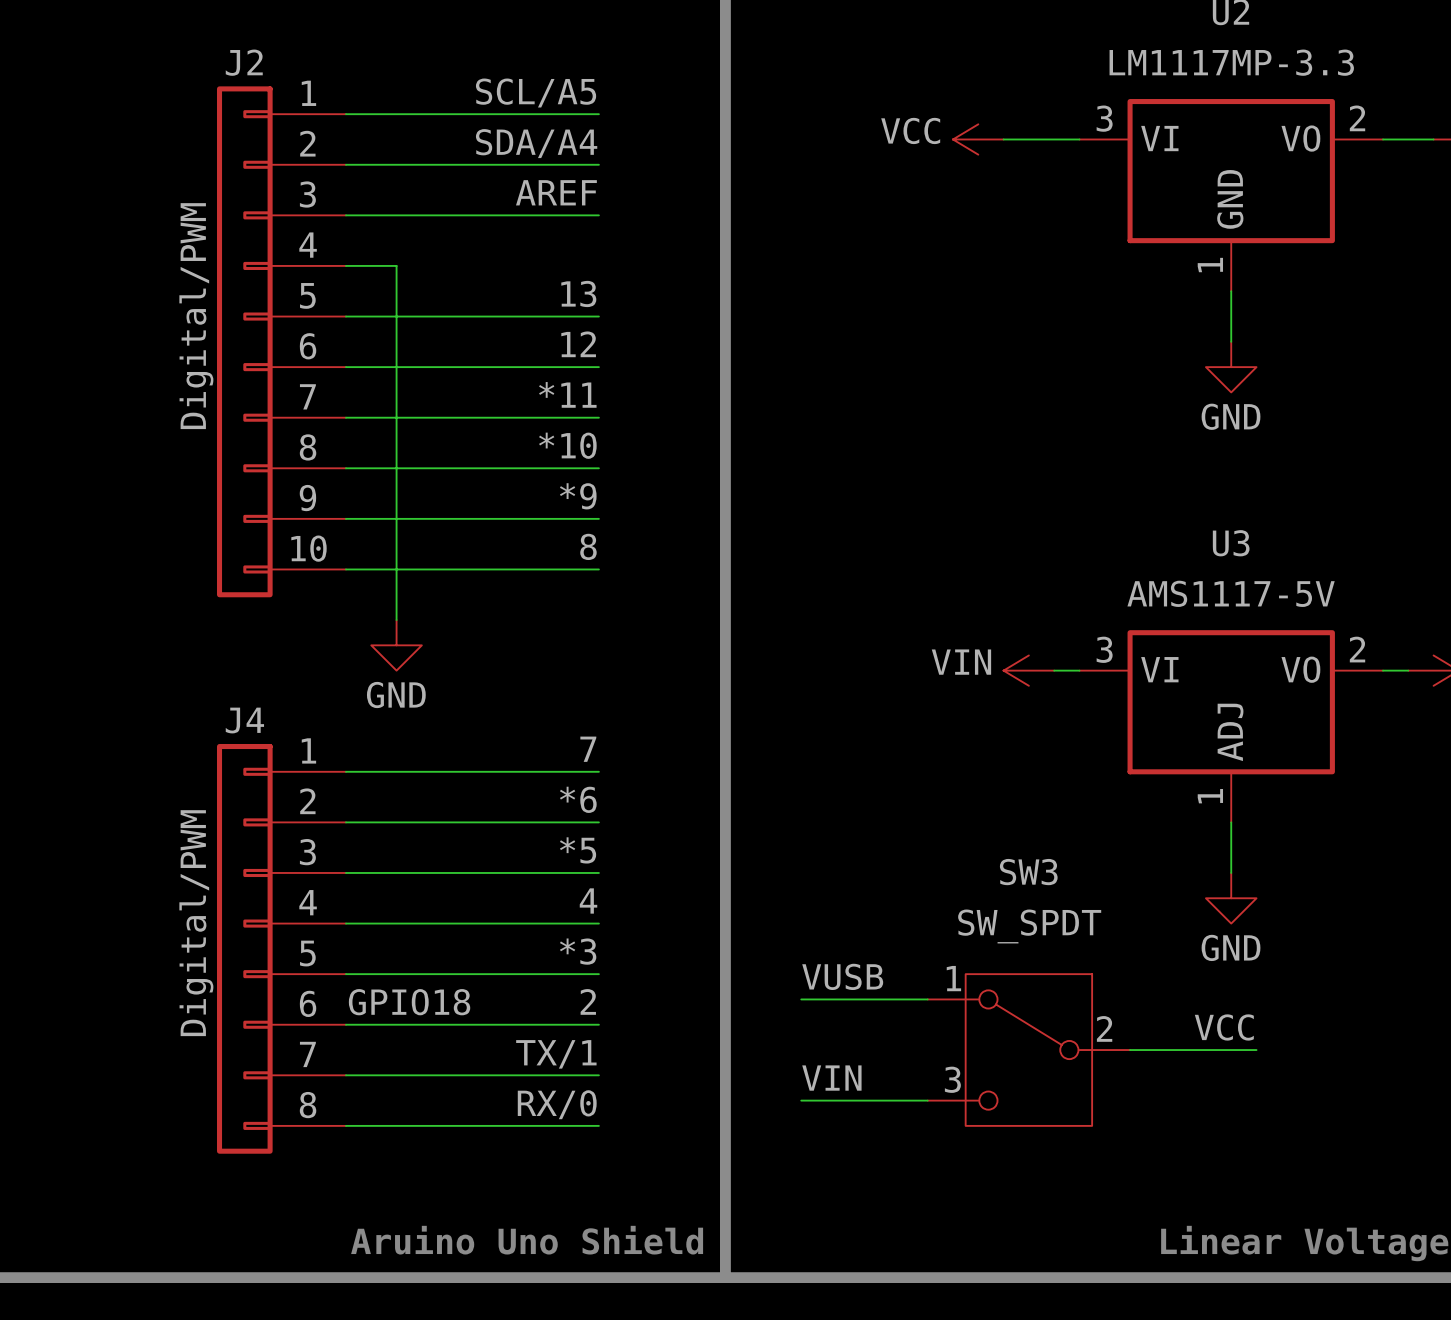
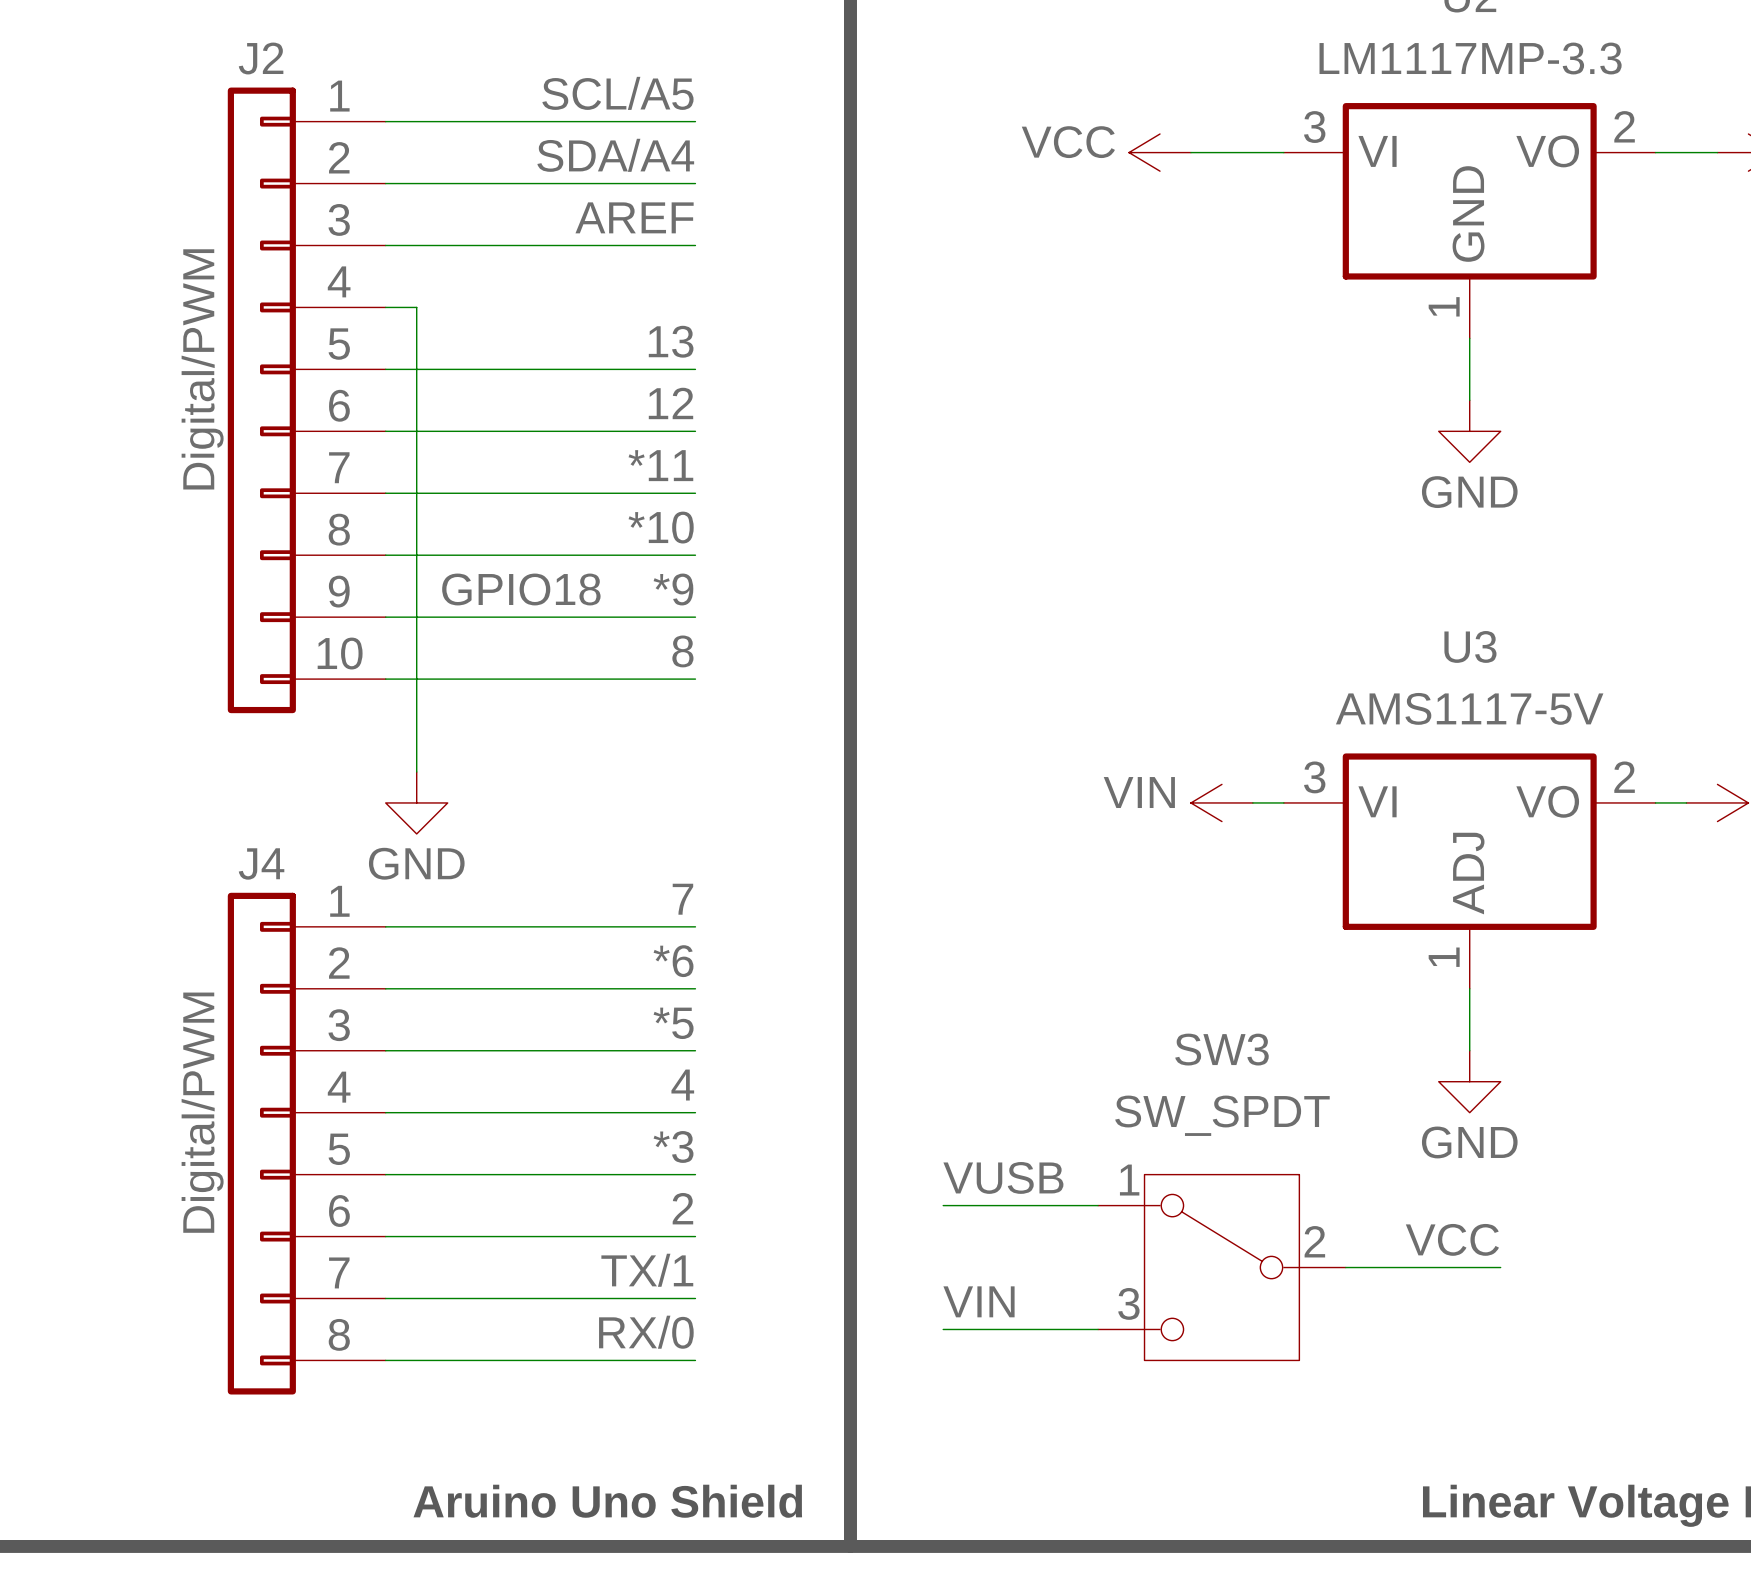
wire: (371, 265) (396, 265) (396, 620) -> (416, 307) (416, 772)
label: none -> GPIO18 (521, 589)
power symbol position: GND (396, 645) -> GND (416, 802)
label: GPIO18 (409, 1002) -> none

